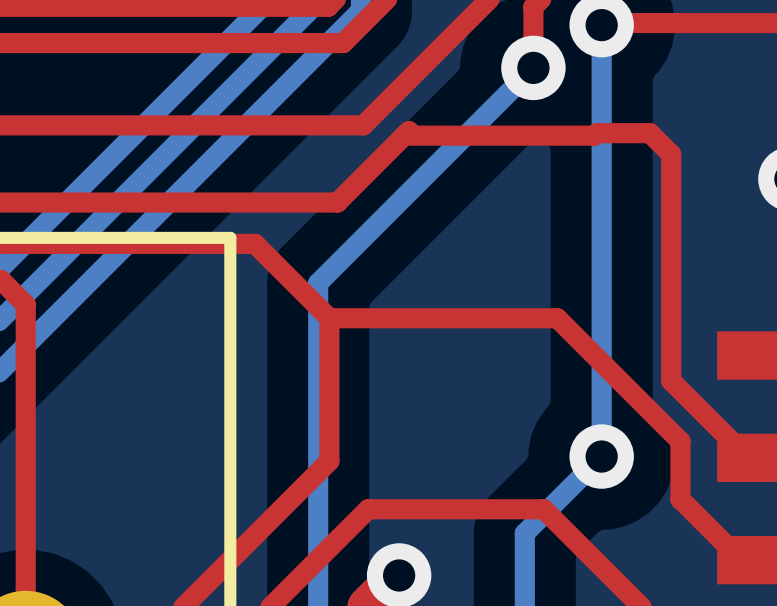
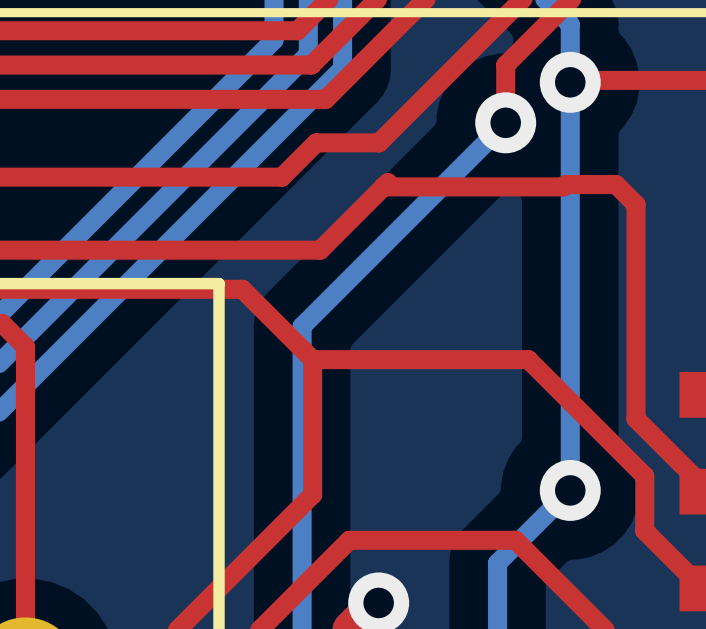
top track: (399, 89) (363, 125) (296, 125) -> (379, 142) (316, 142) (281, 177)

